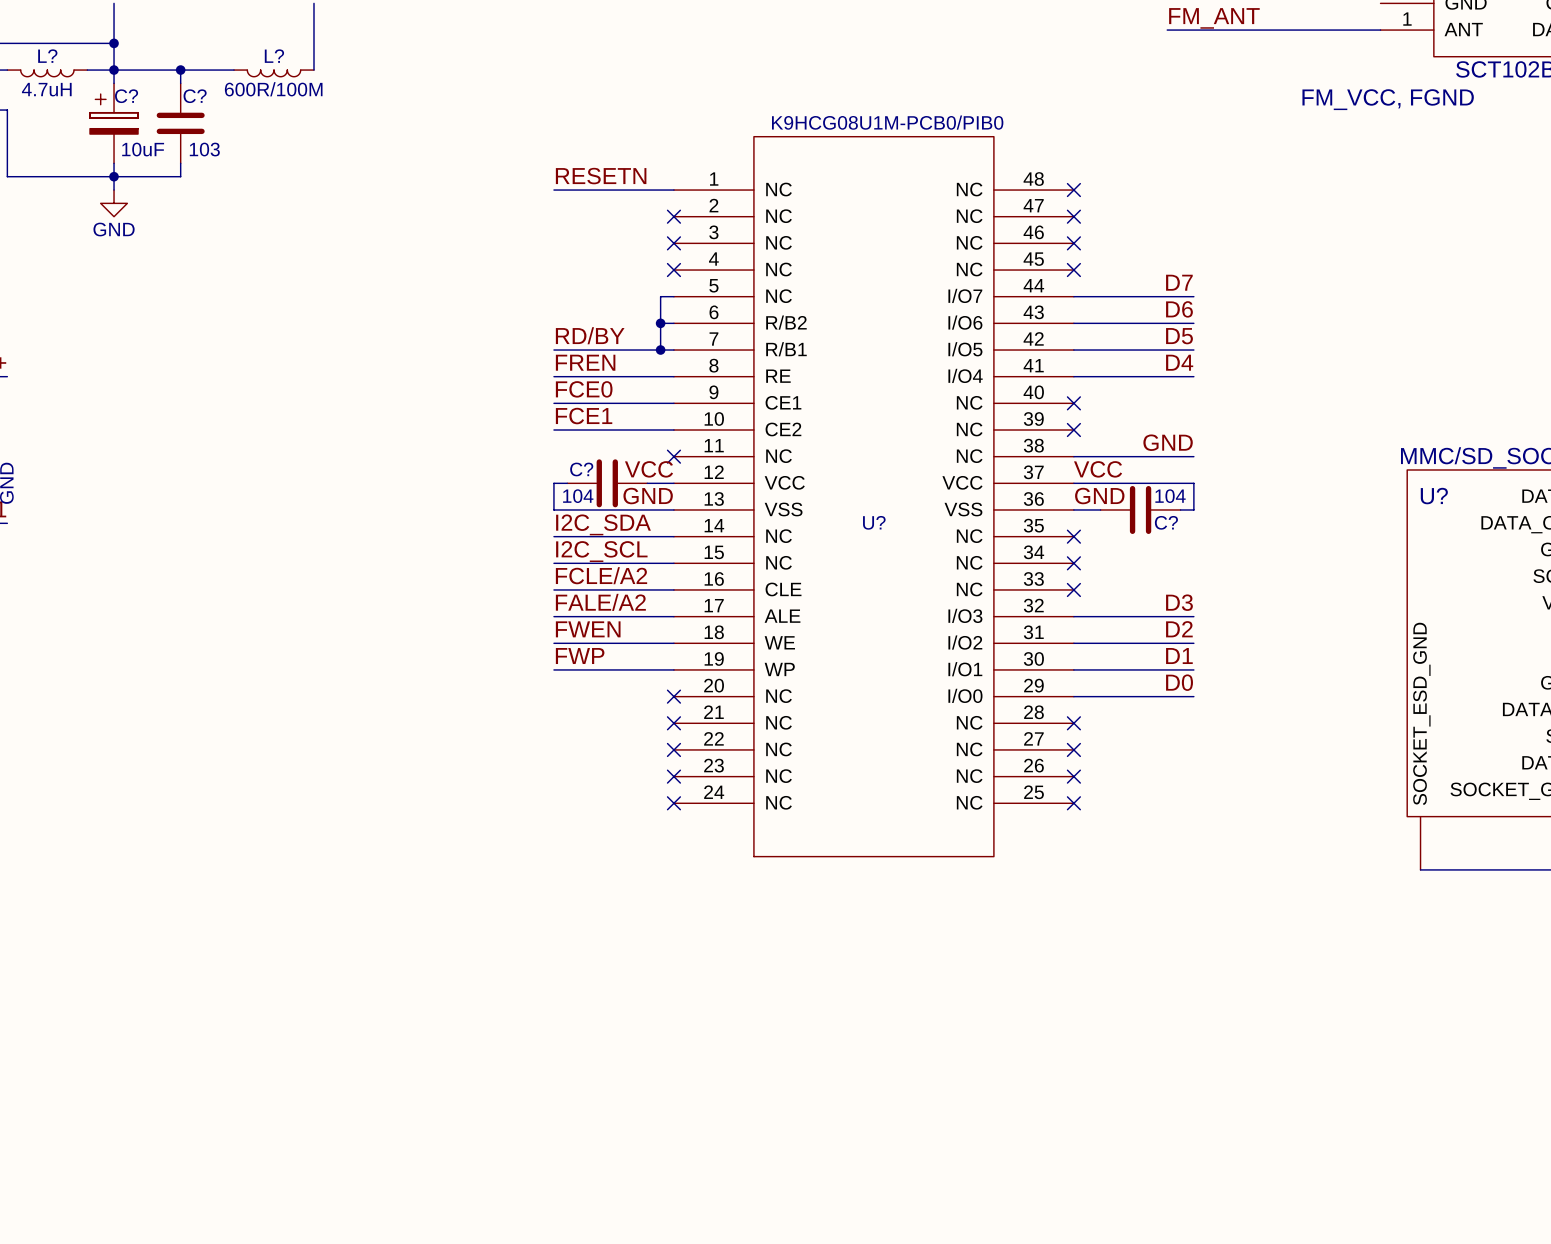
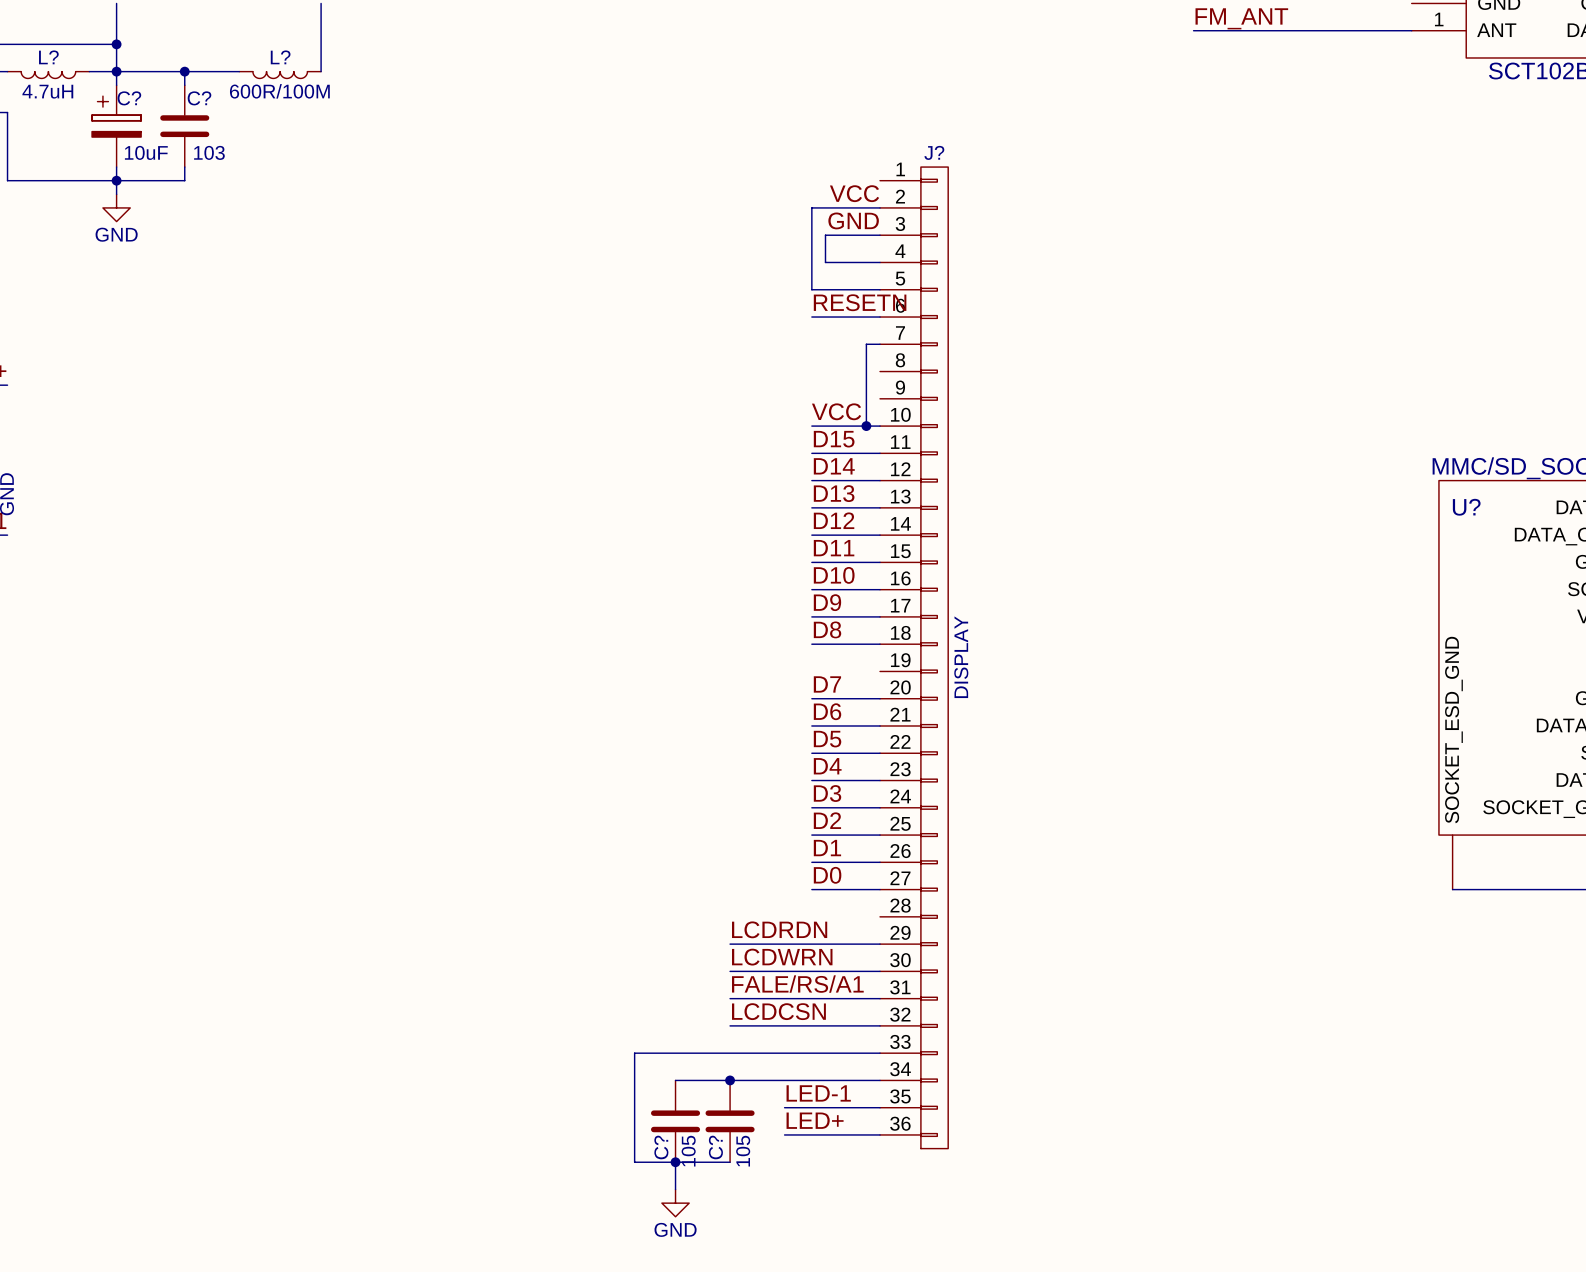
text: FM_VCC, FGND (1388, 99) -> none
label: RESETN (601, 176) -> none
label: none -> VCC (854, 193)
wire: (553, 190) (673, 190) -> none
no-connect mark: (1073, 190) -> none
wire: none -> (880, 207) (811, 207) (811, 289) (880, 289)
no-connect mark: (673, 216) -> none
label: none -> GND (853, 220)
no-connect mark: (1073, 216) -> none
wire: none -> (880, 235) (825, 235) (825, 262) (880, 262)
no-connect mark: (673, 243) -> none
no-connect mark: (1073, 243) -> none
no-connect mark: (673, 270) -> none
no-connect mark: (1073, 270) -> none
label: D7 (1179, 282) -> none
wire: (673, 296) (660, 296) (660, 350) -> none
label: none -> RESETN (860, 302)
wire: (1073, 296) (1193, 296) -> none
label: D6 (1179, 309) -> none
wire: none -> (811, 317) (880, 317)
wire: (660, 323) (673, 323) -> none
junction: (660, 323) -> none
wire: (1073, 323) (1193, 323) -> none
label: RD/BY (590, 335) -> none
wire: none -> (880, 344) (866, 344) (866, 426)
label: D5 (1179, 336) -> none
wire: (553, 350) (673, 350) -> none
junction: (660, 350) -> none
wire: (1073, 350) (1193, 350) -> none
label: FREN (585, 362) -> none
label: D4 (1179, 362) -> none
wire: (553, 376) (673, 376) -> none
wire: (1073, 376) (1193, 376) -> none
label: FCE0 (584, 389) -> none
wire: (553, 403) (673, 403) -> none
no-connect mark: (1073, 403) -> none
label: FCE1 (584, 416) -> none
wire: none -> (811, 426) (880, 426)
junction: none -> (866, 426)
label: none -> D15 (834, 439)
wire: (553, 430) (673, 430) -> none
no-connect mark: (1073, 430) -> none
label: GND (1168, 442) -> none
wire: none -> (811, 453) (880, 453)
no-connect mark: (673, 456) -> none
label: none -> D14 (834, 466)
wire: (1073, 456) (1193, 456) -> none
label position: VCC (649, 469) -> VCC (836, 411)
wire: none -> (811, 480) (880, 480)
label: VCC (1098, 469) -> none
label: none -> D13 (834, 493)
wire: (567, 483) (553, 483) (553, 509) (673, 509) -> none
C?: 104 (607, 483) -> none
wire: (647, 483) (673, 483) -> none
wire: (1073, 483) (1193, 483) (1193, 509) (1180, 509) -> none
label: GND (648, 496) -> none
wire: none -> (811, 507) (880, 507)
U?: K9HCG08U1M-PCB0/PIB0 (873, 496) -> none
label: GND (1099, 496) -> none
label: none -> D12 (834, 520)
wire: (1073, 509) (1100, 509) -> none
C?: 104 (1140, 509) -> none
wire: none -> (811, 535) (880, 535)
label: I2C_SDA (603, 524) -> none
wire: (553, 536) (673, 536) -> none
label: none -> D11 (834, 548)
no-connect mark: (1073, 536) -> none
wire: none -> (811, 562) (880, 562)
label: I2C_SCL (601, 551) -> none
label: none -> D10 (834, 575)
wire: (553, 563) (673, 563) -> none
no-connect mark: (1073, 563) -> none
label: FCLE/A2 (601, 575) -> none
wire: none -> (811, 589) (880, 589)
wire: (553, 589) (673, 589) -> none
label: none -> D9 (827, 602)
no-connect mark: (1073, 589) -> none
label: FALE/A2 (600, 602) -> none
label: D3 (1179, 602) -> none
wire: none -> (811, 616) (880, 616)
wire: (553, 616) (673, 616) -> none
label: none -> D8 (827, 629)
wire: (1073, 616) (1193, 616) -> none
label: FWEN (588, 629) -> none
wire: none -> (811, 644) (880, 644)
label: D2 (1179, 629) -> none
wire: (553, 643) (673, 643) -> none
J?: none -> DISPLAY (914, 657)
wire: (1073, 643) (1193, 643) -> none
label: FWP (580, 656) -> none
label: D1 (1179, 656) -> none
wire: (553, 669) (673, 669) -> none
label: none -> D7 (827, 684)
wire: (1073, 669) (1193, 669) -> none
label: D0 (1179, 682) -> none
wire: none -> (811, 698) (880, 698)
no-connect mark: (673, 696) -> none
label: none -> D6 (827, 711)
wire: (1073, 696) (1193, 696) -> none
wire: none -> (811, 725) (880, 725)
label: none -> D5 (827, 739)
no-connect mark: (673, 723) -> none
no-connect mark: (1073, 723) -> none
wire: none -> (811, 753) (880, 753)
no-connect mark: (673, 749) -> none
label: none -> D4 (827, 766)
no-connect mark: (1073, 749) -> none
wire: none -> (811, 780) (880, 780)
label: none -> D3 (827, 793)
no-connect mark: (673, 776) -> none
no-connect mark: (1073, 776) -> none
wire: none -> (811, 807) (880, 807)
label: none -> D2 (827, 820)
no-connect mark: (673, 803) -> none
no-connect mark: (1073, 803) -> none
wire: none -> (811, 835) (880, 835)
label: none -> D1 (827, 848)
wire: none -> (811, 862) (880, 862)
label: none -> D0 (827, 875)
wire: none -> (811, 889) (880, 889)
label: none -> LCDRDN (779, 929)
wire: none -> (730, 944) (880, 944)
label: none -> LCDWRN (782, 957)
wire: none -> (730, 971) (880, 971)
label: none -> FALE/RS/A1 (797, 984)
wire: none -> (730, 998) (880, 998)
label: none -> LCDCSN (778, 1011)
wire: none -> (730, 1025) (880, 1025)
wire: none -> (880, 1053) (634, 1053) (634, 1162) (730, 1162)
wire: none -> (675, 1080) (880, 1080)
junction: none -> (730, 1080)
label: none -> LED-1 (818, 1093)
wire: none -> (784, 1107) (880, 1107)
label: none -> LED+ (815, 1120)
C?: none -> 105 (675, 1121)
C?: none -> 105 (730, 1121)
wire: none -> (784, 1134) (880, 1134)
wire: none -> (675, 1162) (675, 1189)
junction: none -> (675, 1162)
power symbol: none -> GND (675, 1203)

